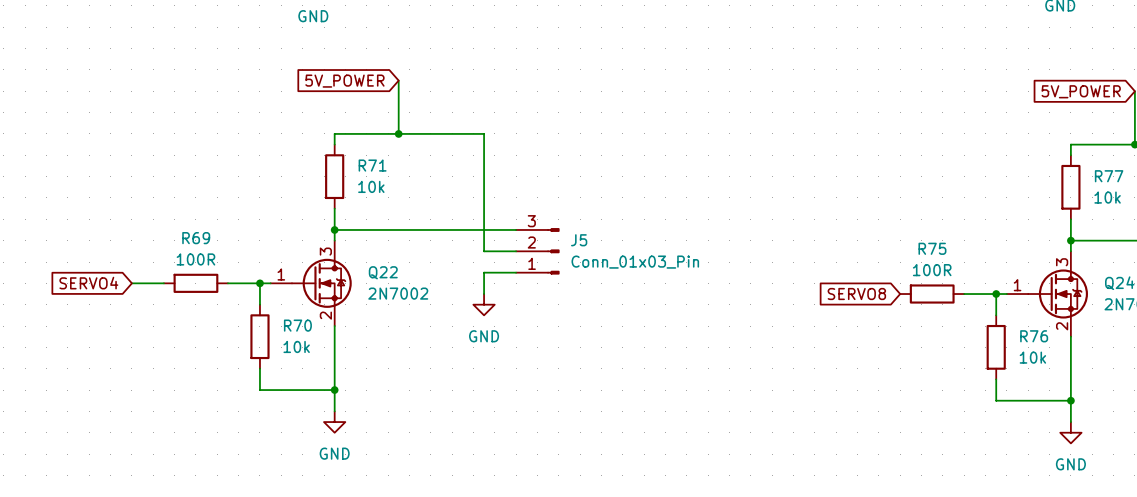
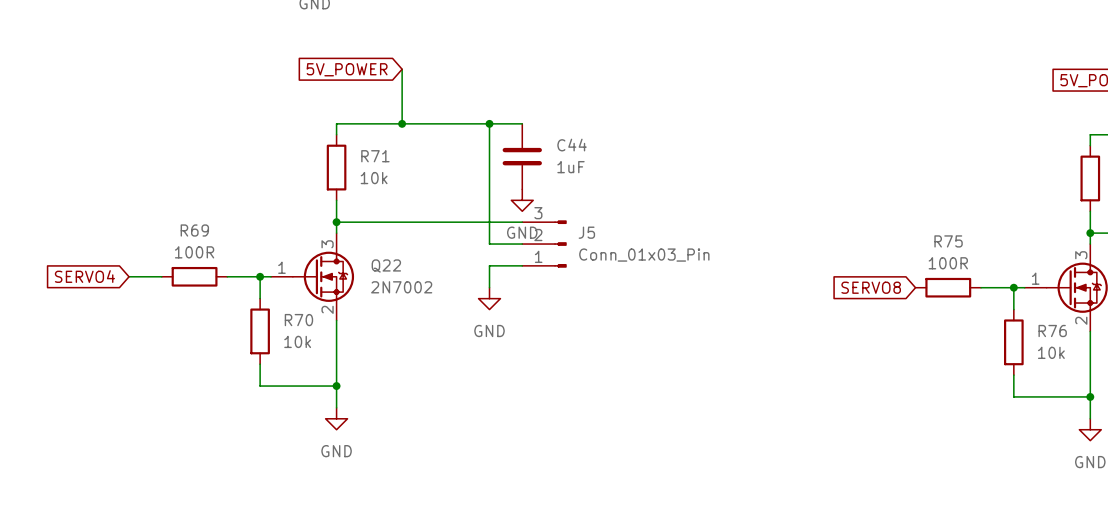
wire: none -> (489, 123) (522, 123)
junction: none -> (489, 123)
C44: none -> 1uF (522, 156)
power symbol: none -> GND (522, 200)

